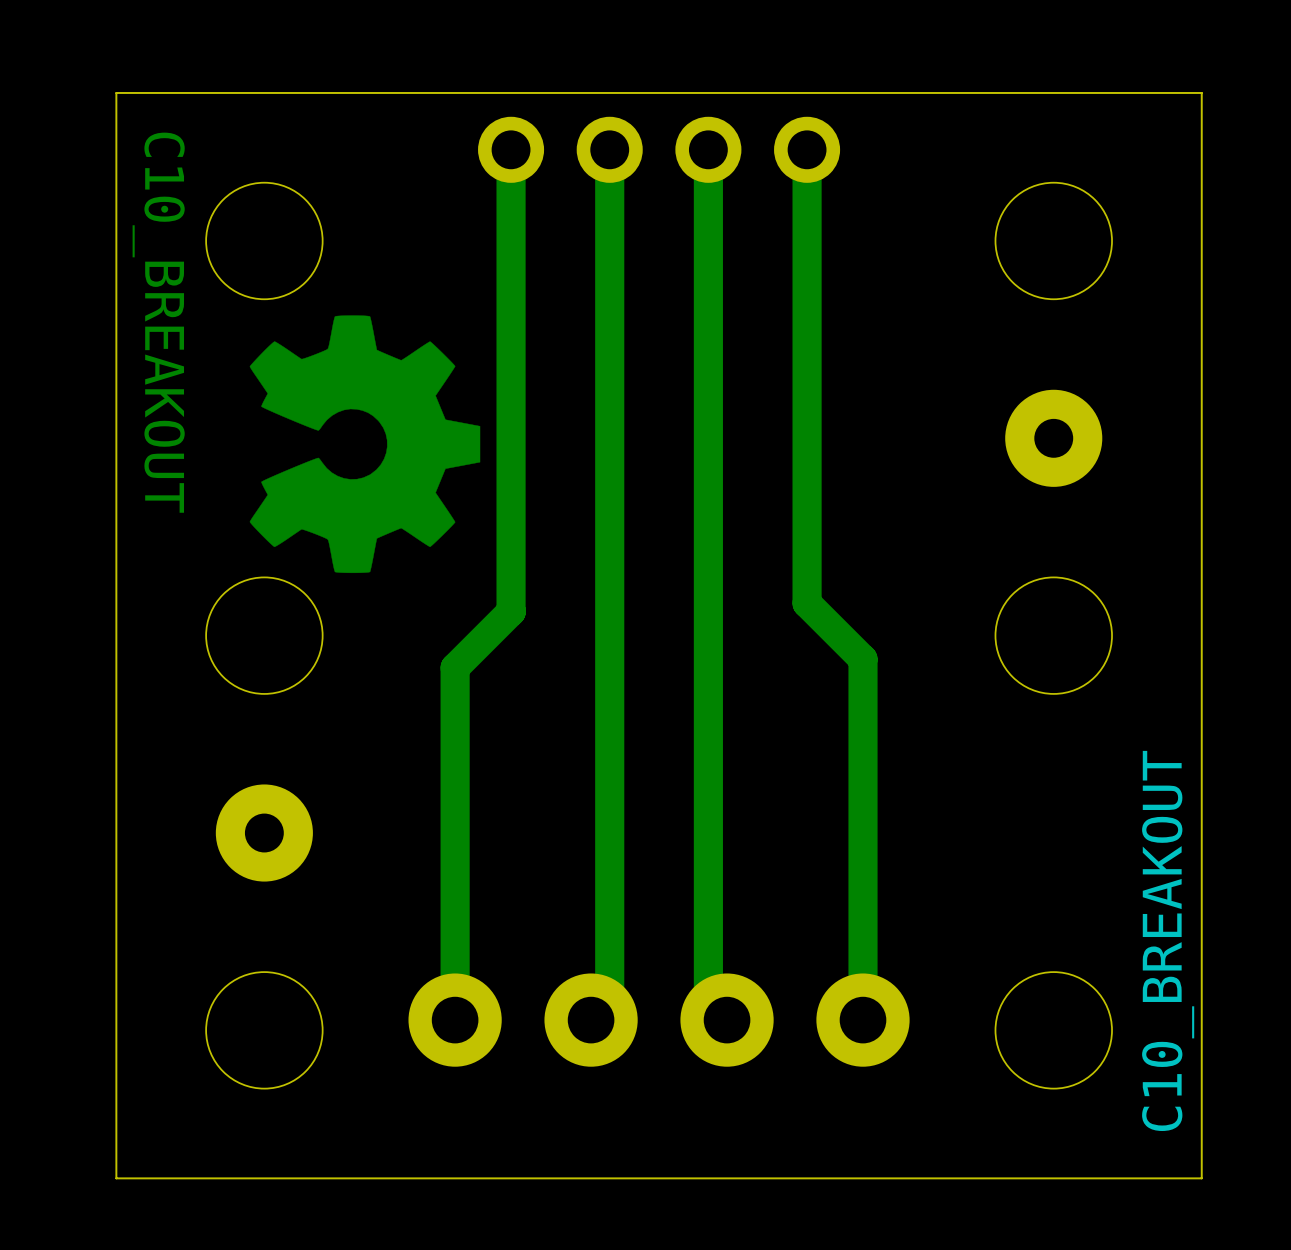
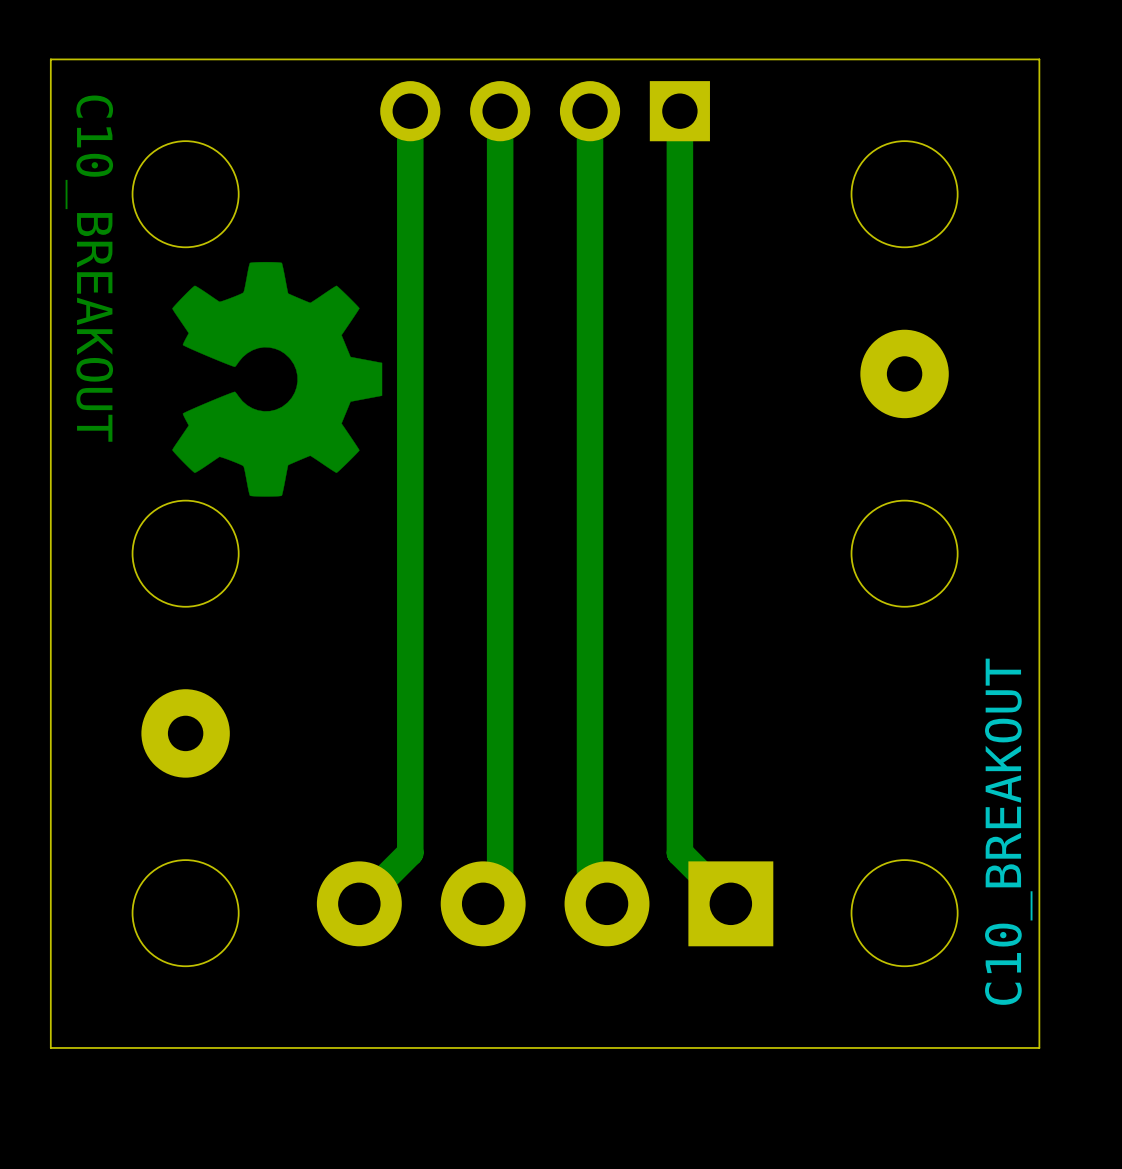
part footprint: [478, 116, 841, 183] -> [380, 81, 710, 142]
track: (807, 603) (863, 659) (863, 1020) -> (679, 524) (679, 852) (730, 903)
track: (511, 611) (455, 667) (455, 1020) -> (410, 531) (410, 852) (359, 903)
part footprint: [408, 973, 910, 1067] -> [316, 861, 774, 947]

